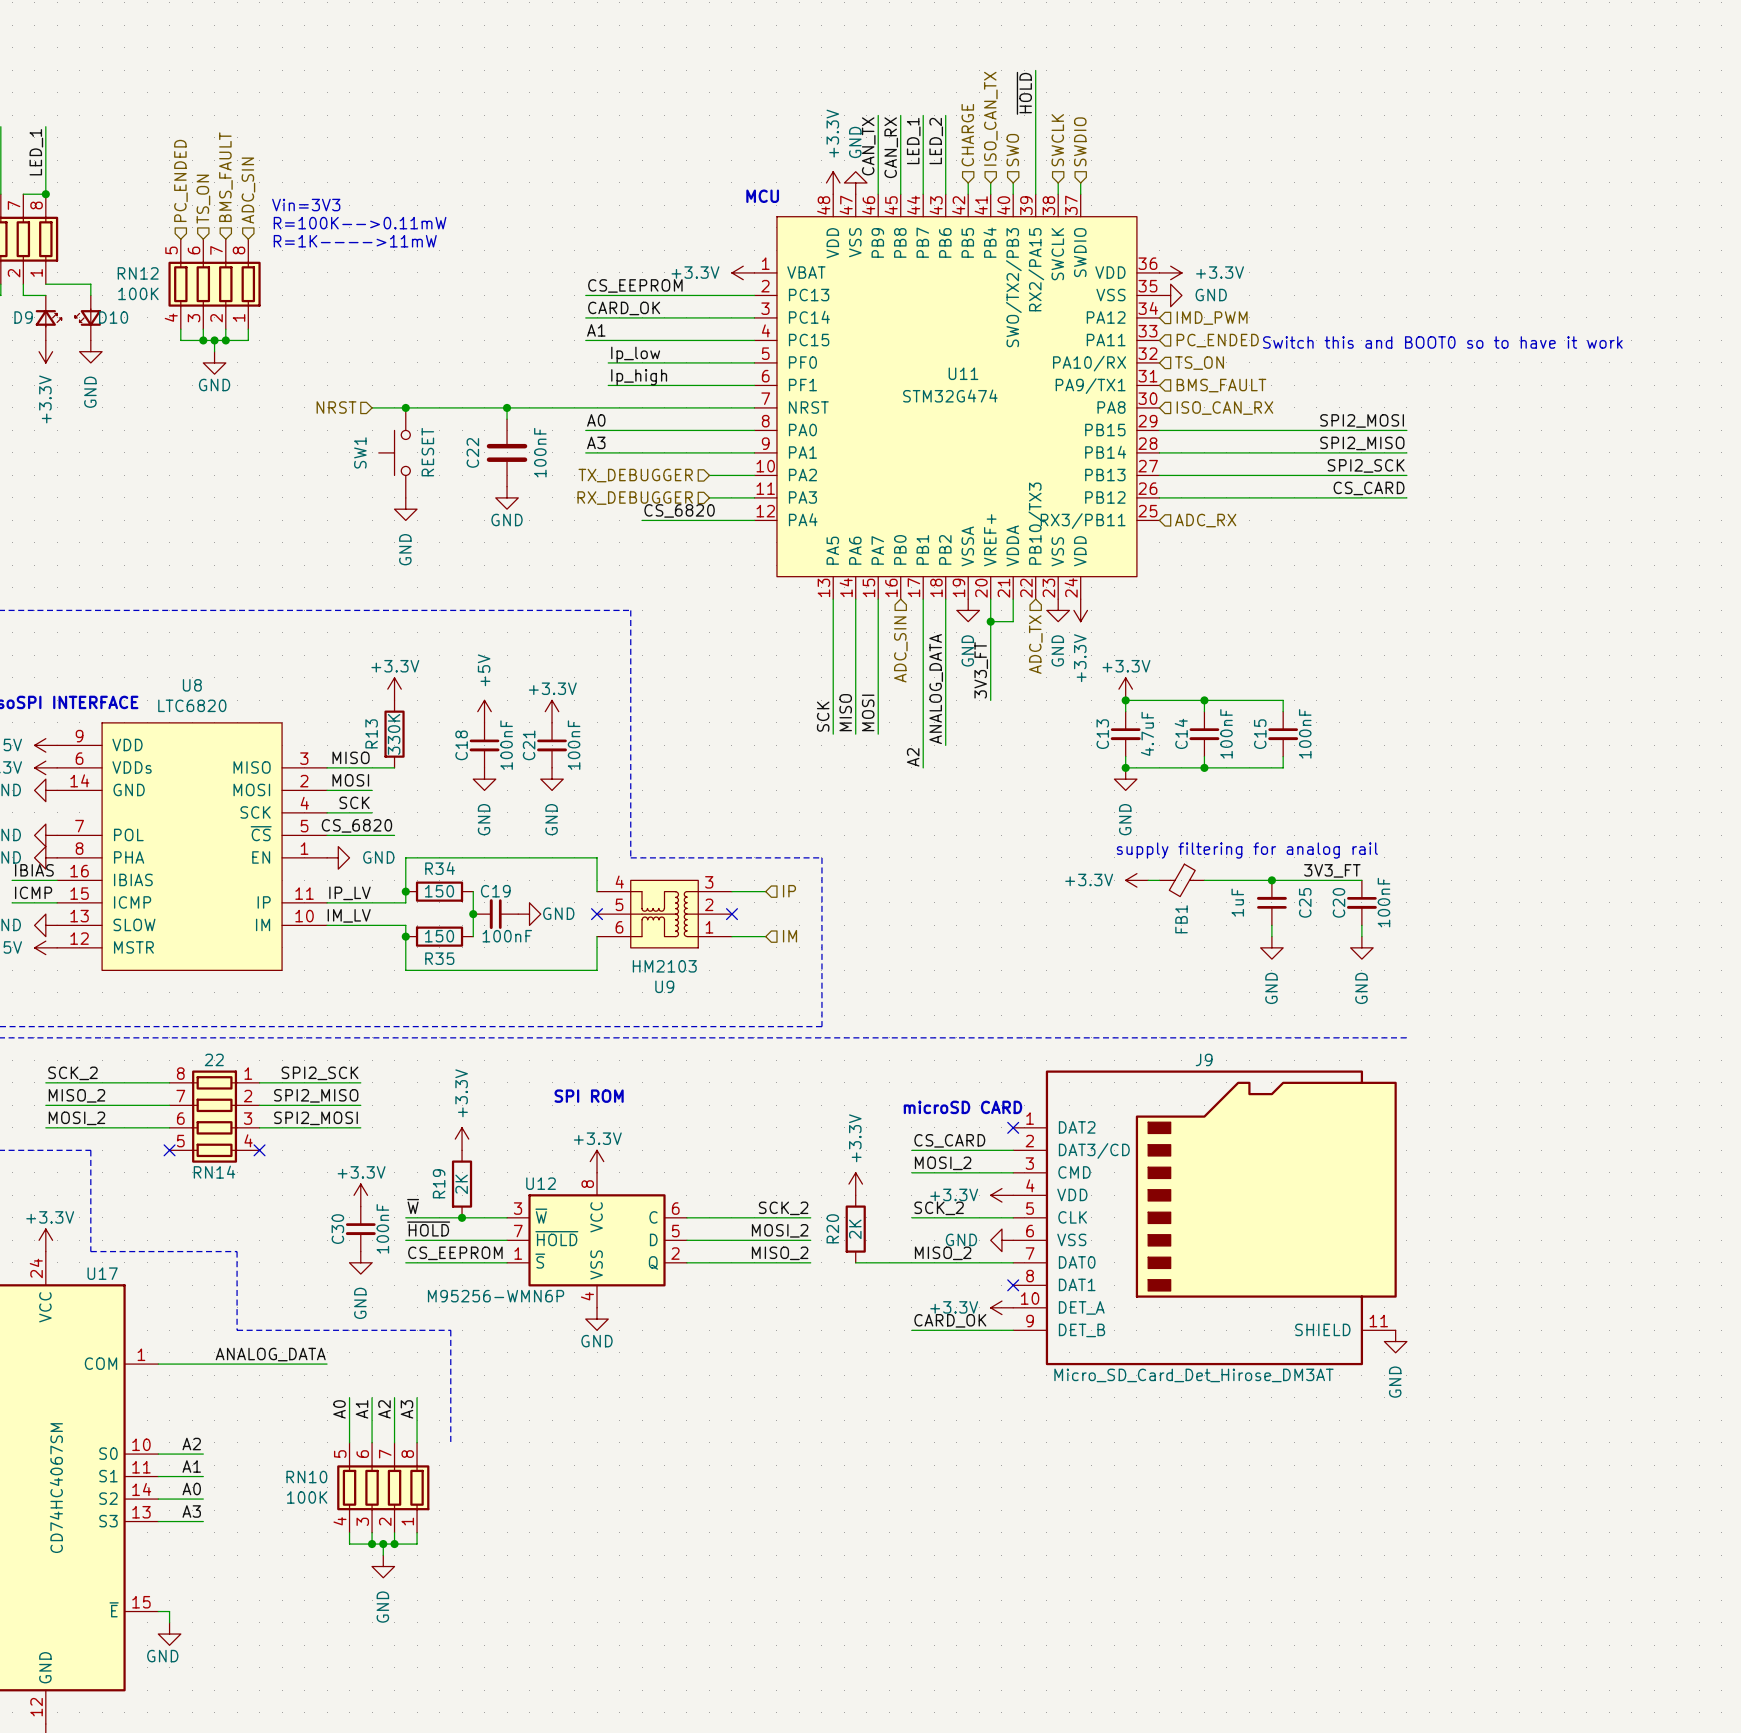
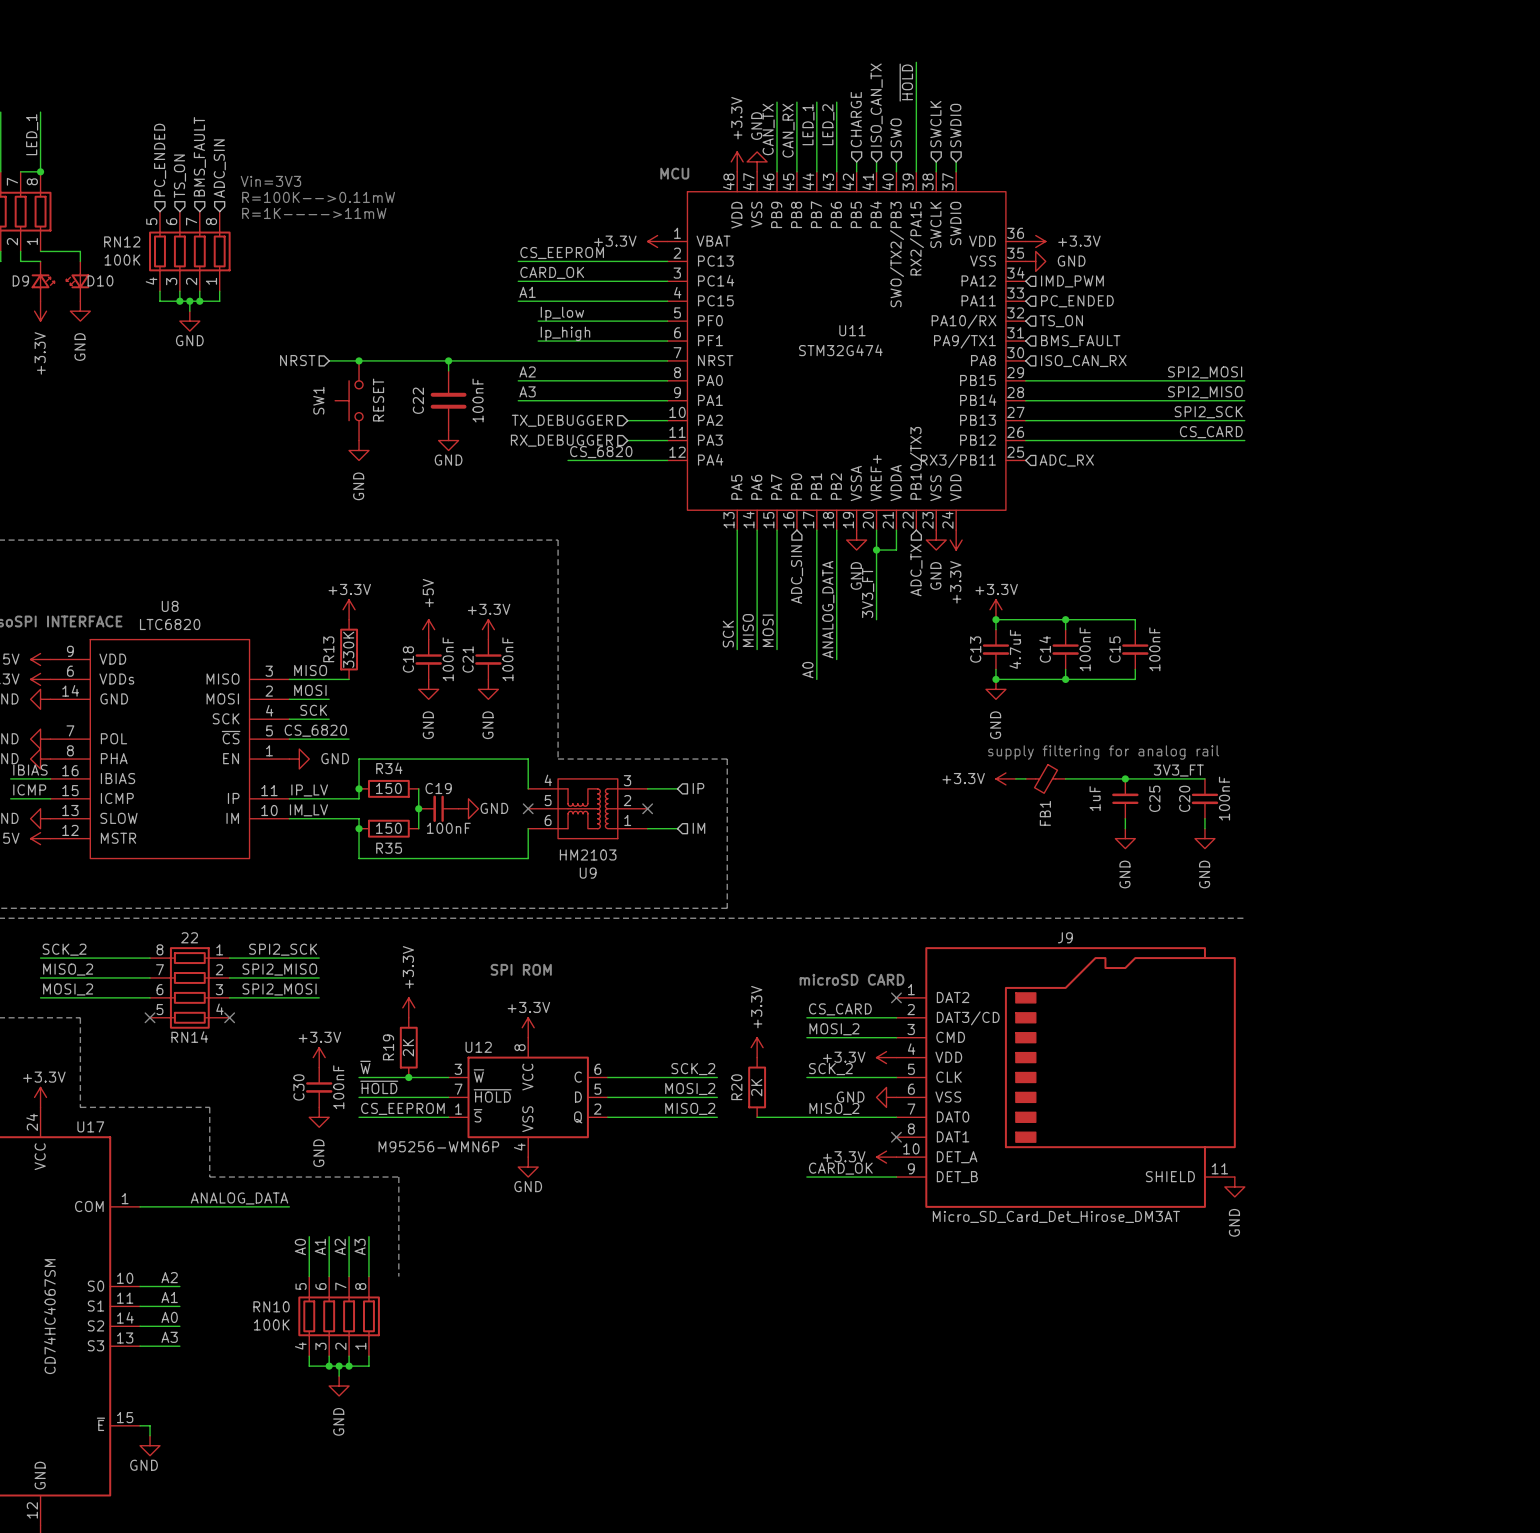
text: Switch this and BOOT0 so to have it work (1442, 342) -> none
label: A0 (596, 420) -> A2 (527, 371)
label: A2 (913, 757) -> A0 (807, 670)

